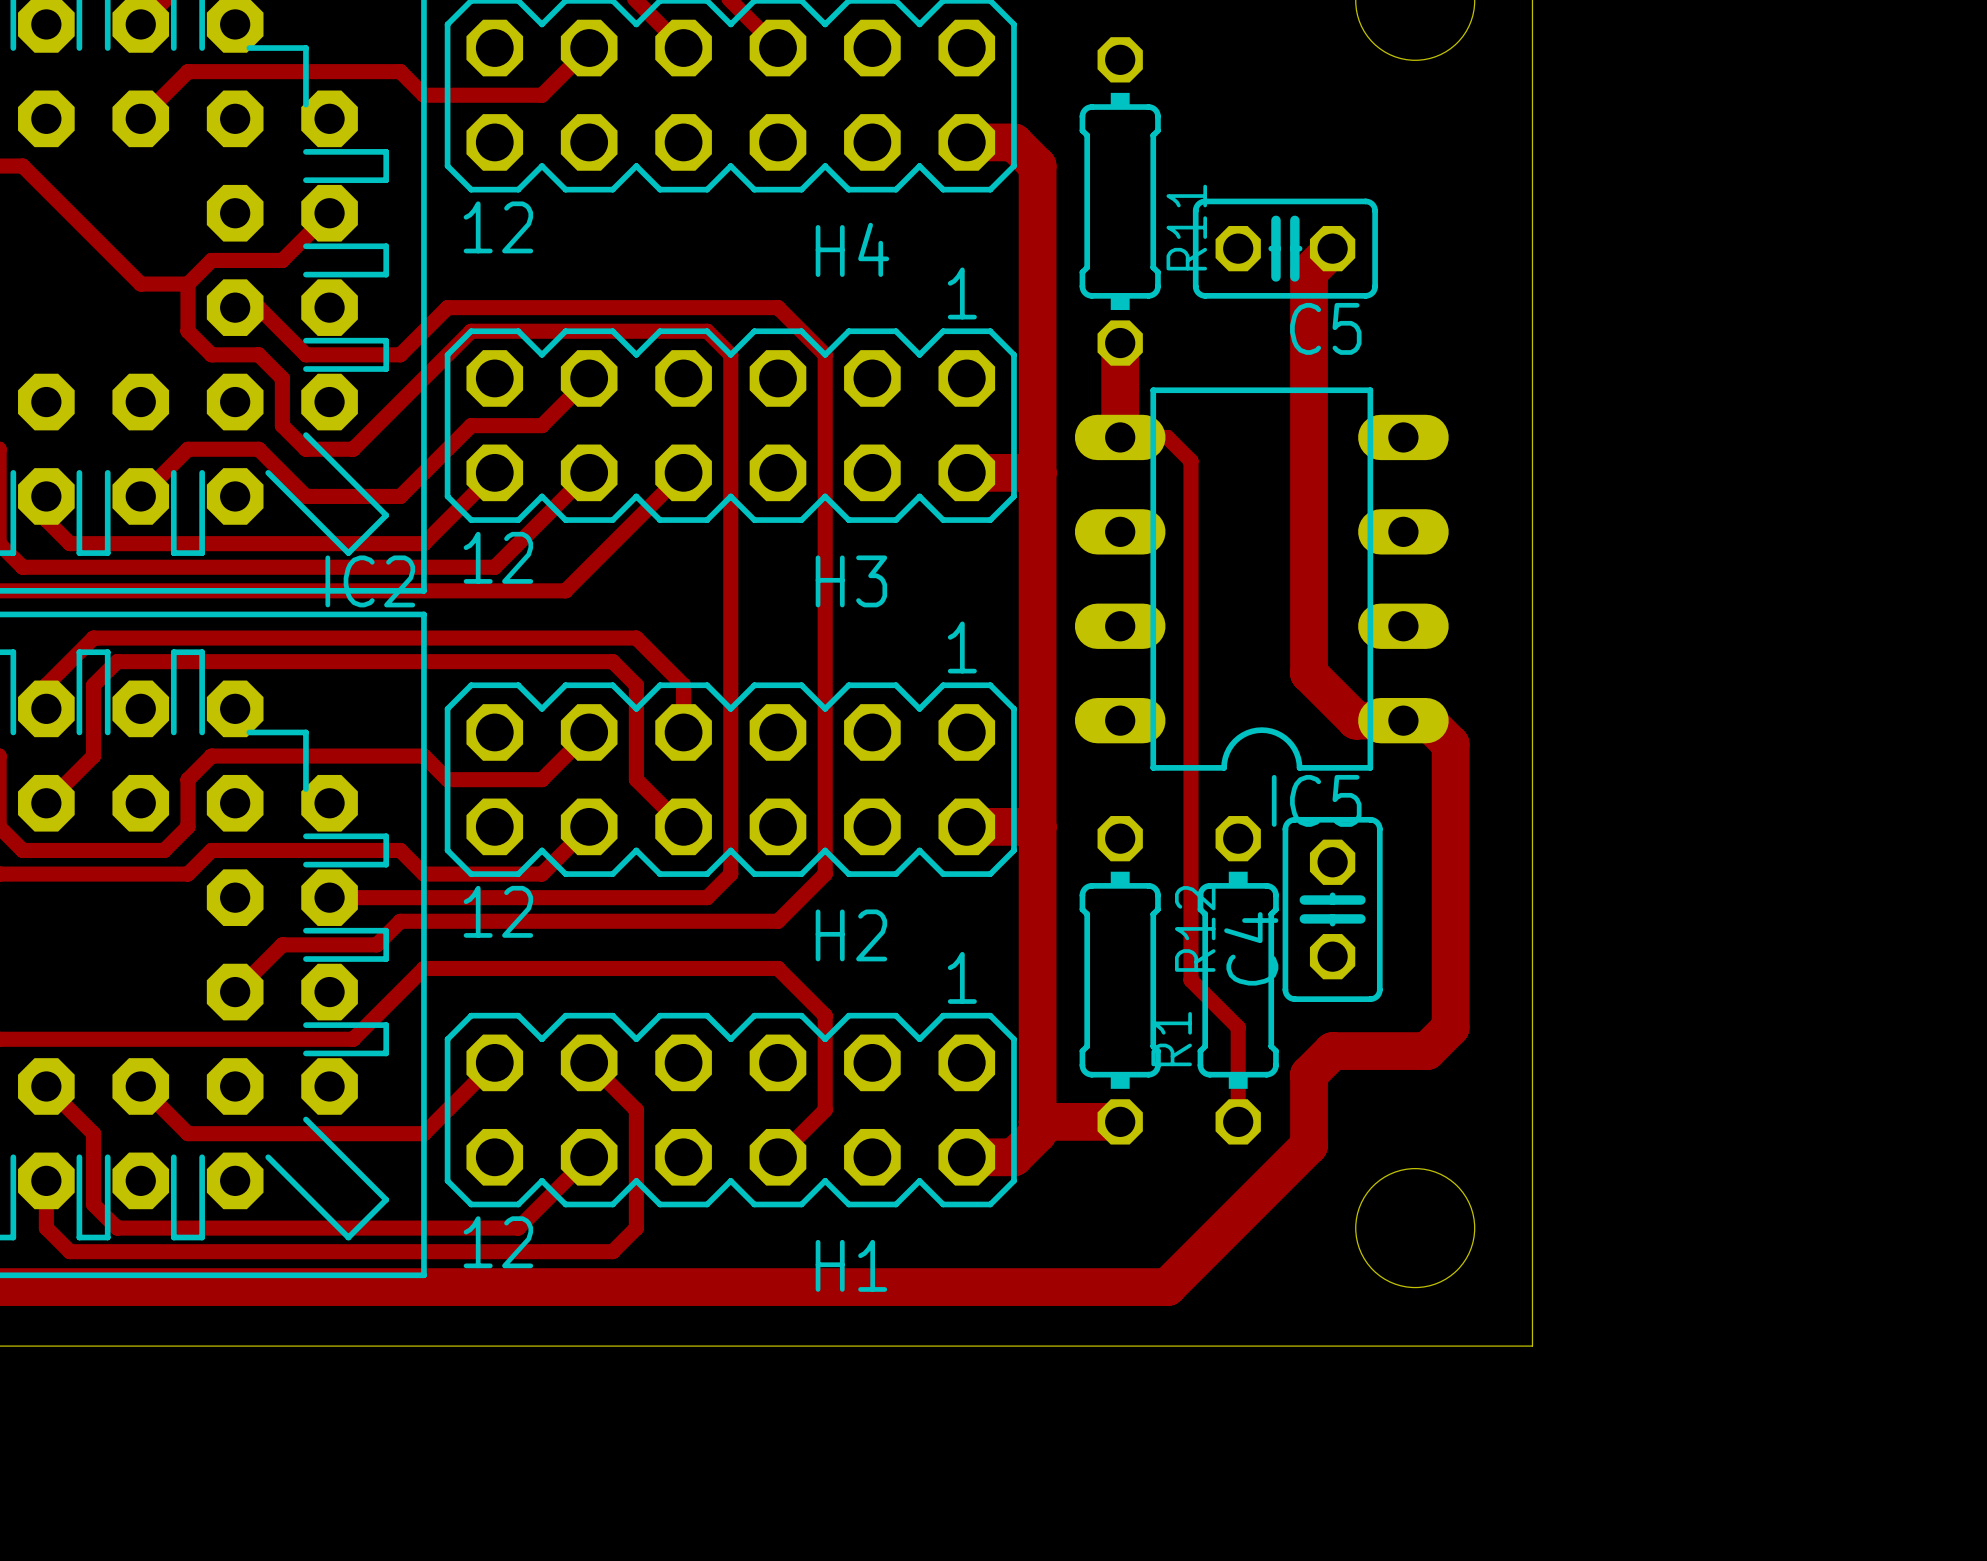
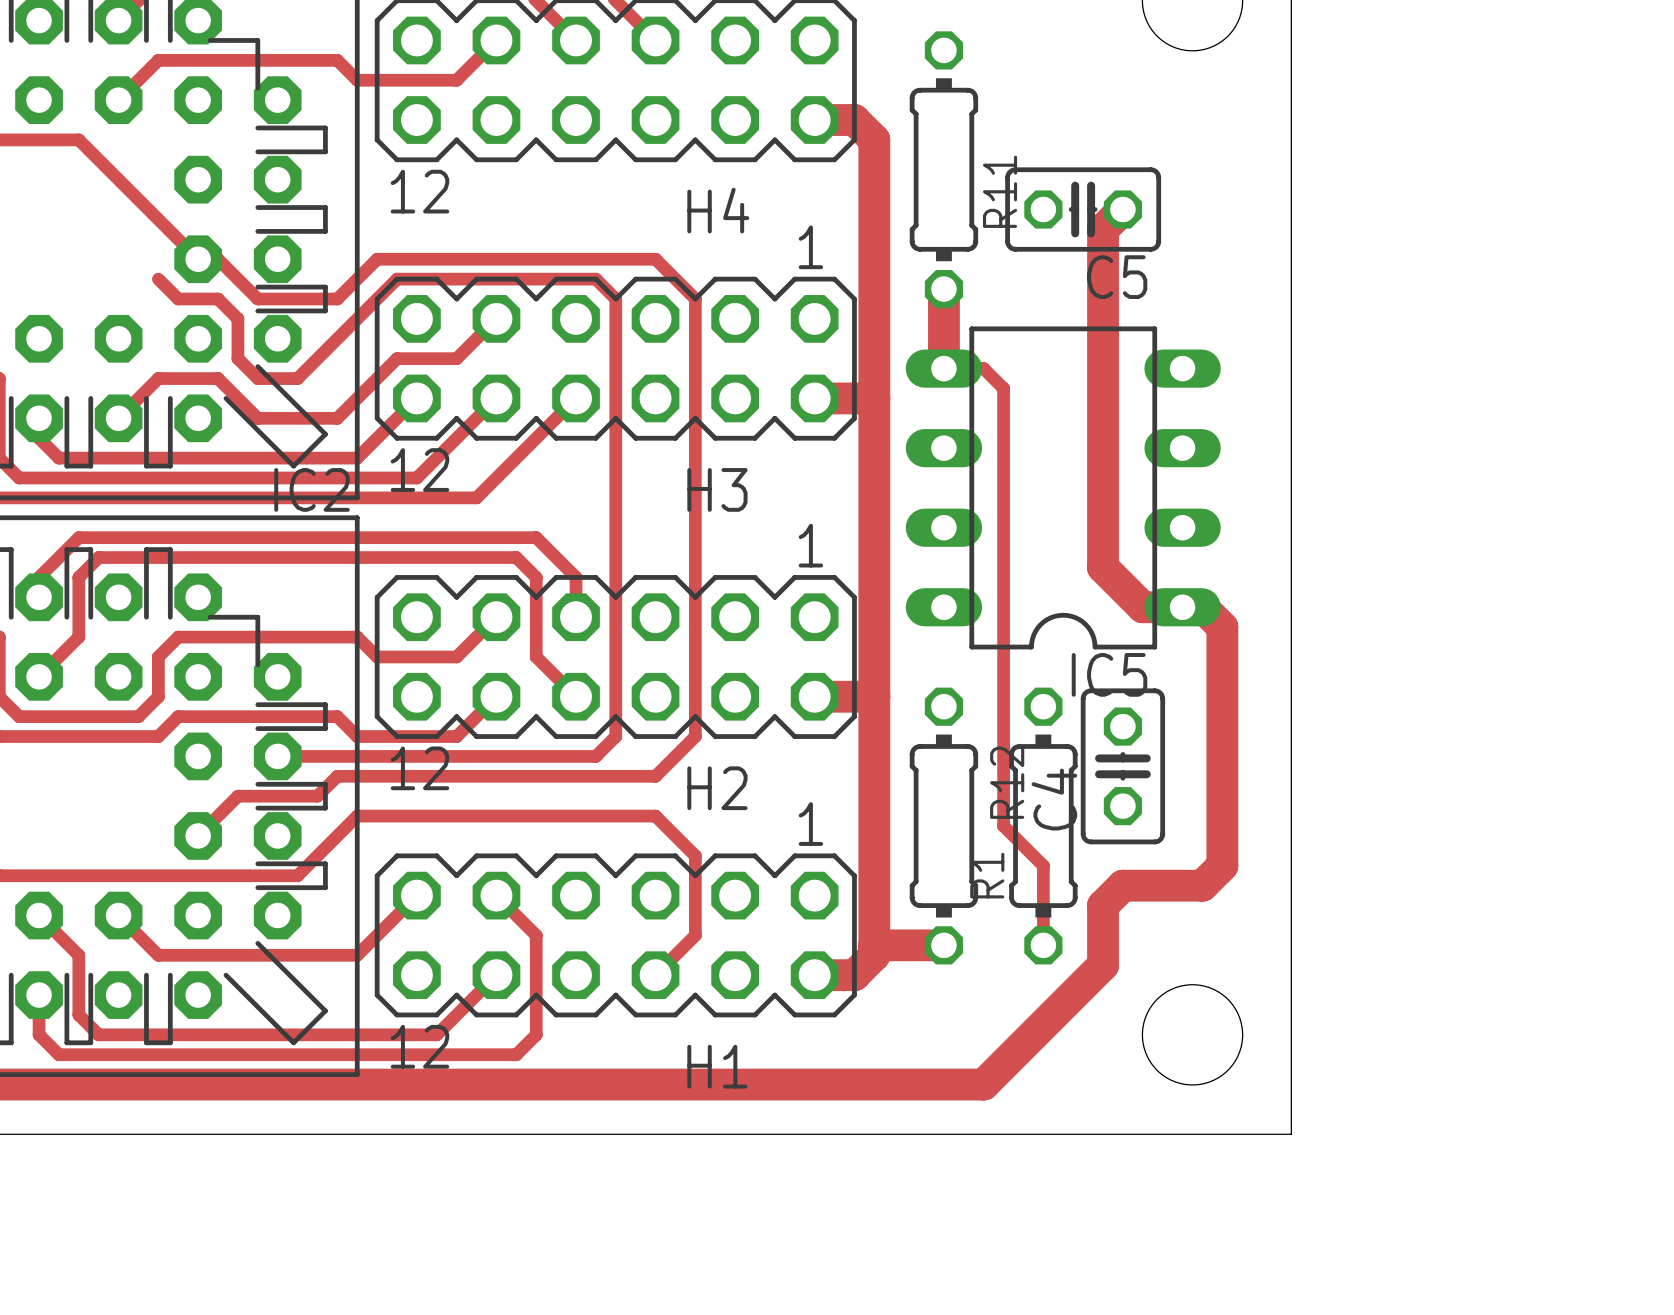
track: (22, 166) (140, 284) (187, 284) -> (19, 139) (78, 139) (198, 259)
track: (329, 213) (282, 260) (211, 260) (187, 284) -> none
track: (187, 284) (187, 331) -> none

